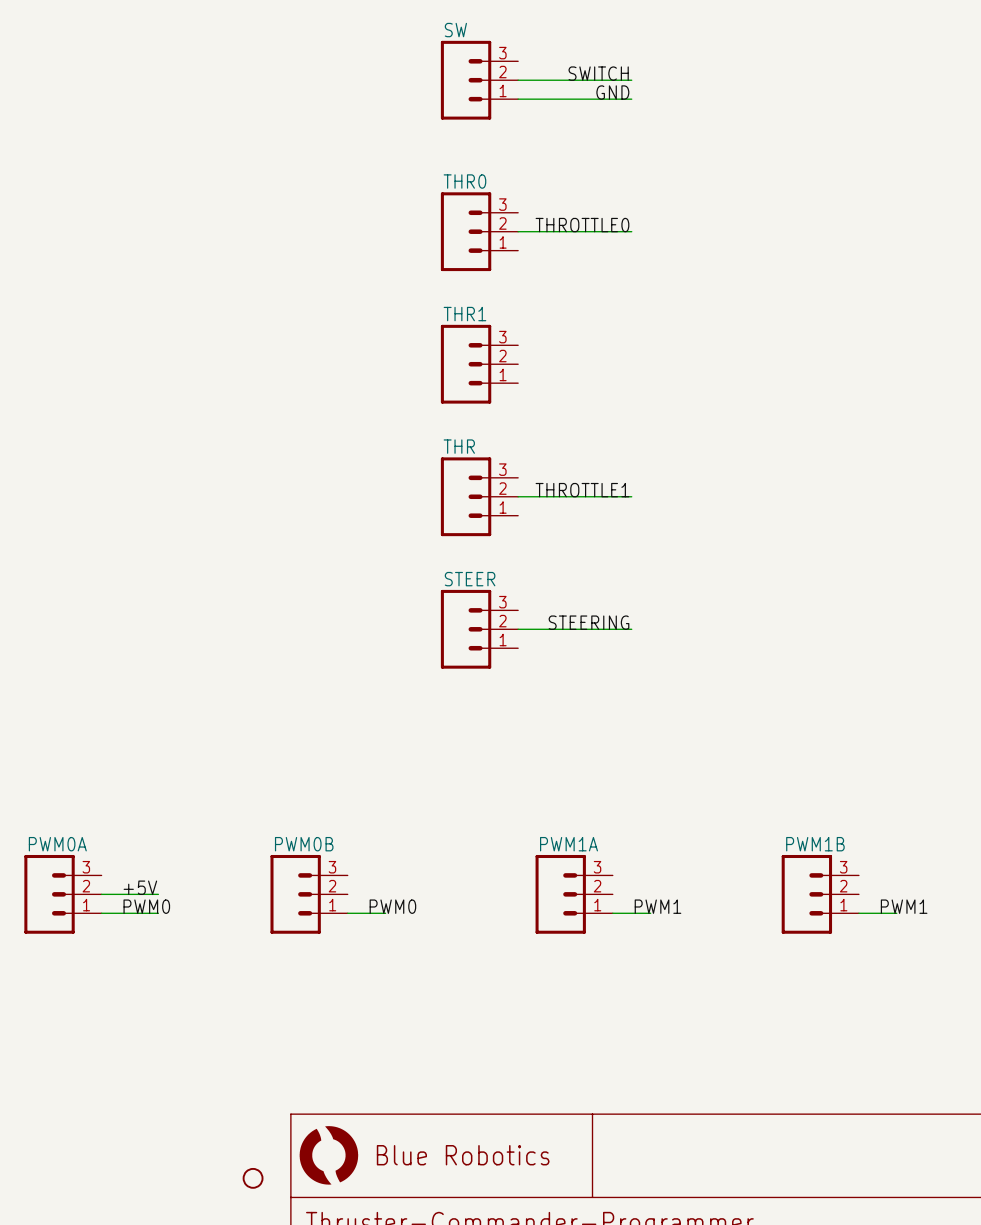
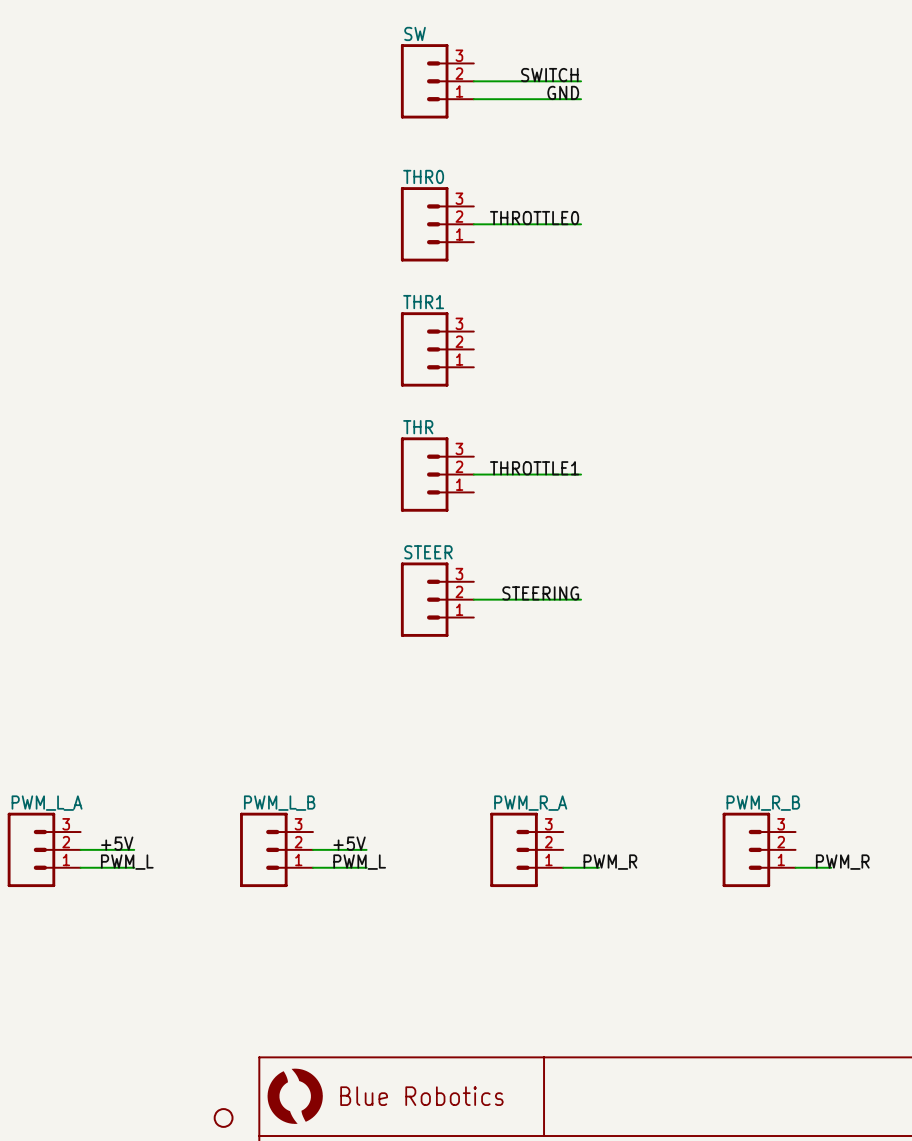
PWM0A name: PWM0A (57, 844) -> PWM_L_A (47, 803)
PWM0B name: PWM0B (304, 844) -> PWM_L_B (279, 803)
PWM1A name: PWM1A (569, 844) -> PWM_R_A (530, 803)
PWM1B name: PWM1B (815, 844) -> PWM_R_B (763, 803)
label: none -> +5V (349, 843)
wire: none -> (312, 849) (366, 849)
label: PWM0 (146, 906) -> PWM_L (127, 862)
label: PWM0 (392, 906) -> PWM_L (359, 862)
label: PWM1 (657, 906) -> PWM_R (610, 862)
label: PWM1 (904, 906) -> PWM_R (842, 862)
wire: none -> (348, 867) (366, 867)

